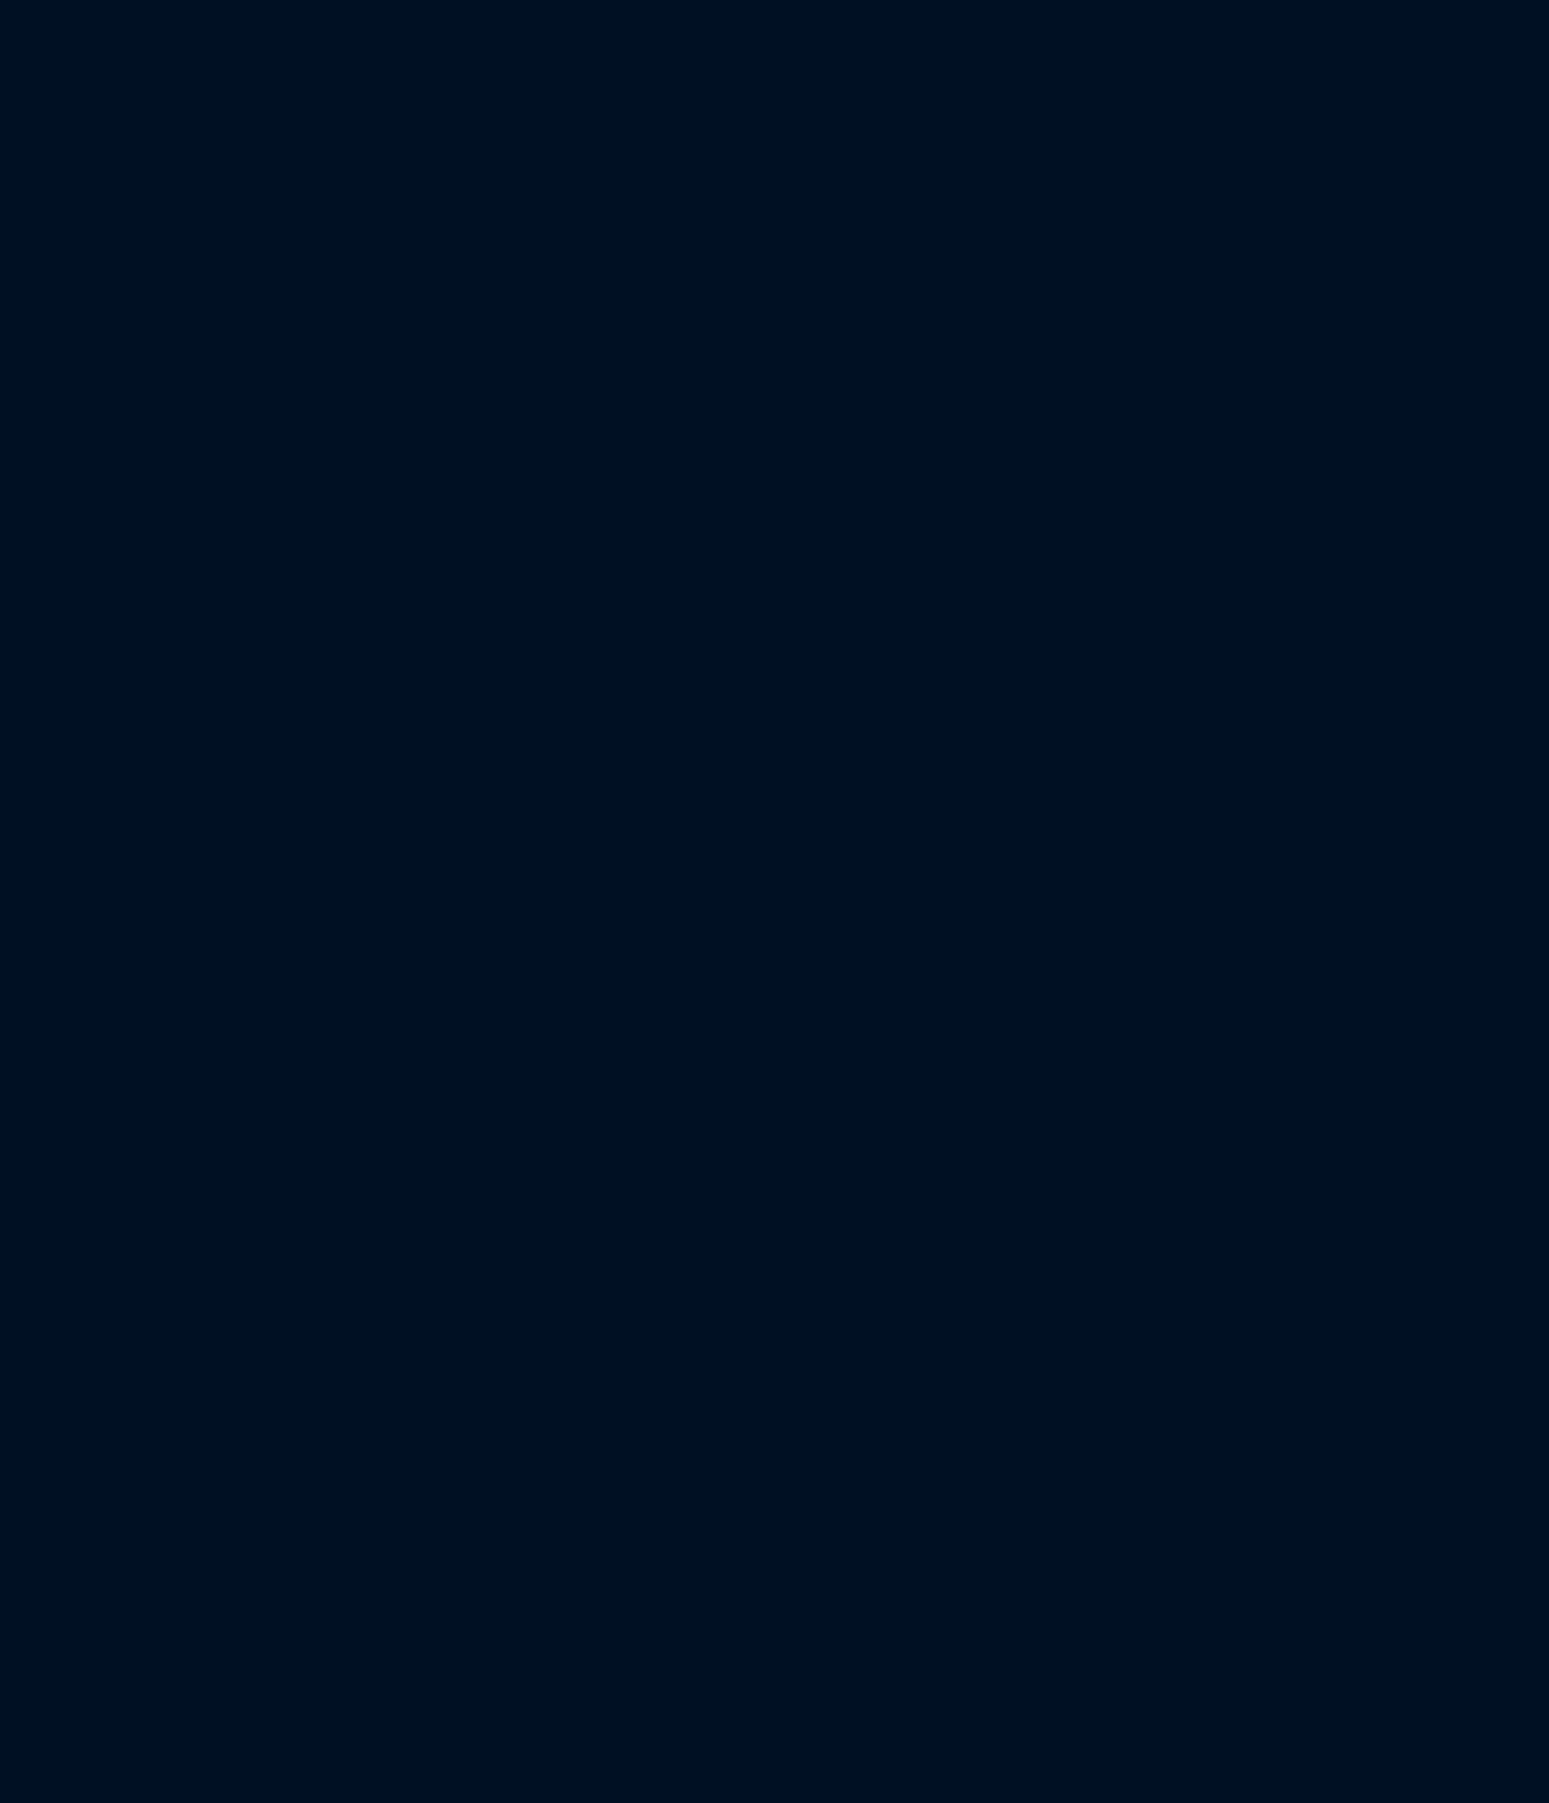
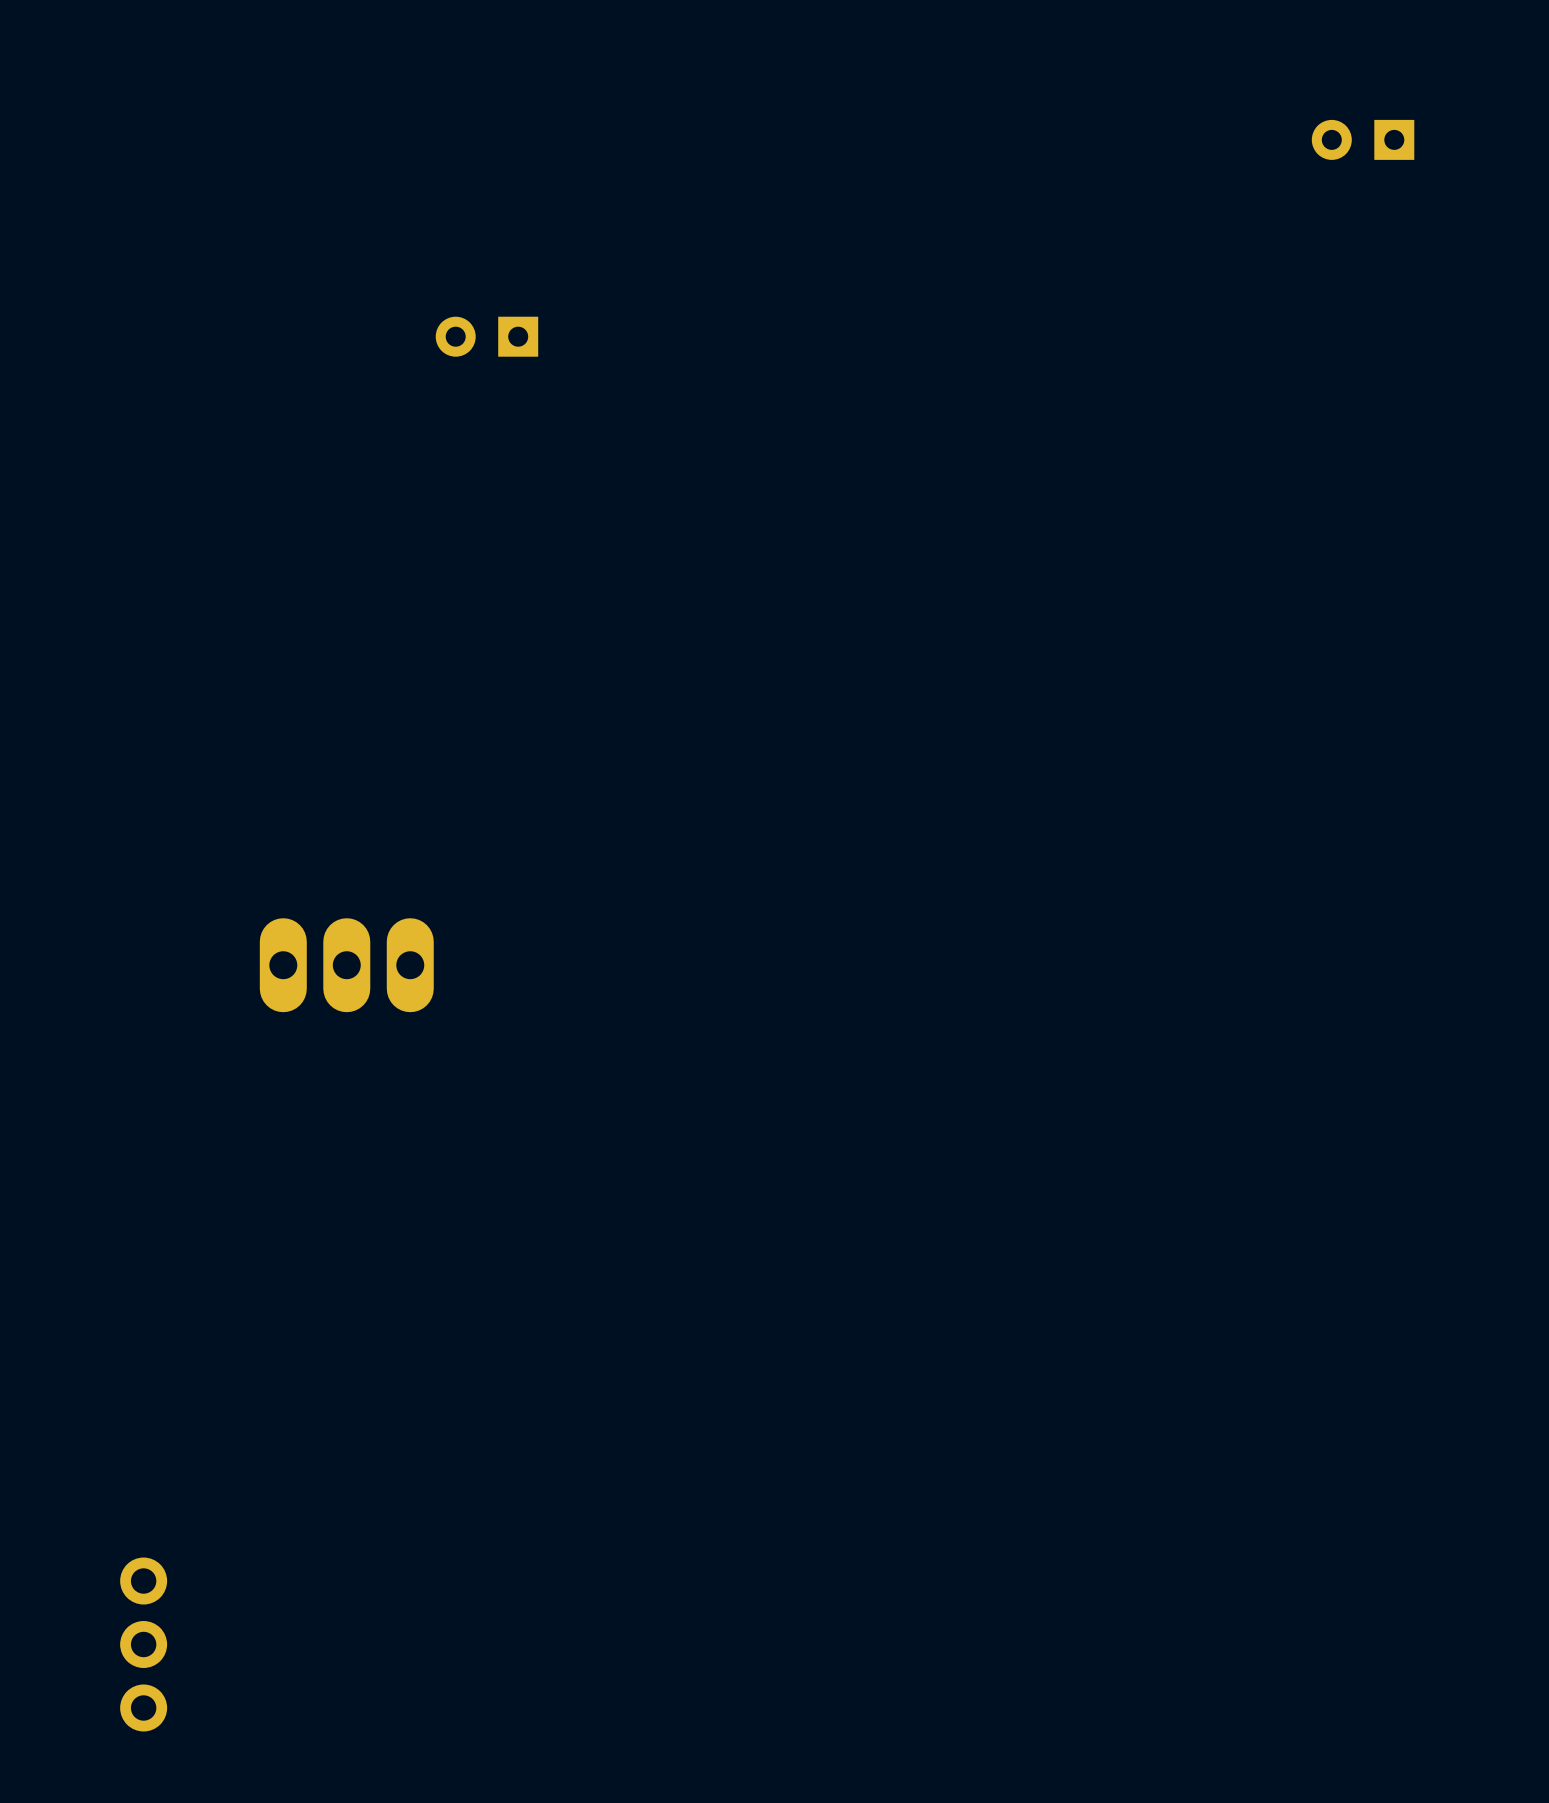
part: none -> (1363, 139)
part: none -> (486, 336)
part: none -> (346, 965)
part: none -> (143, 1644)

